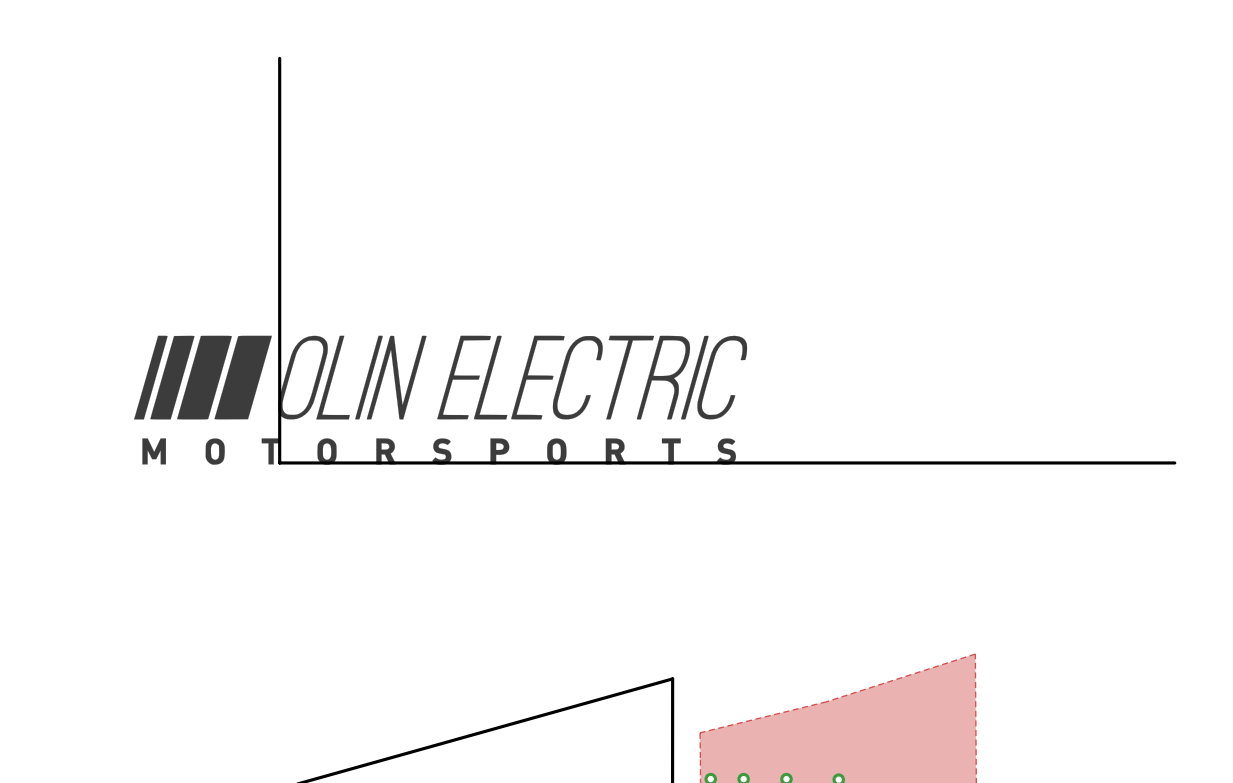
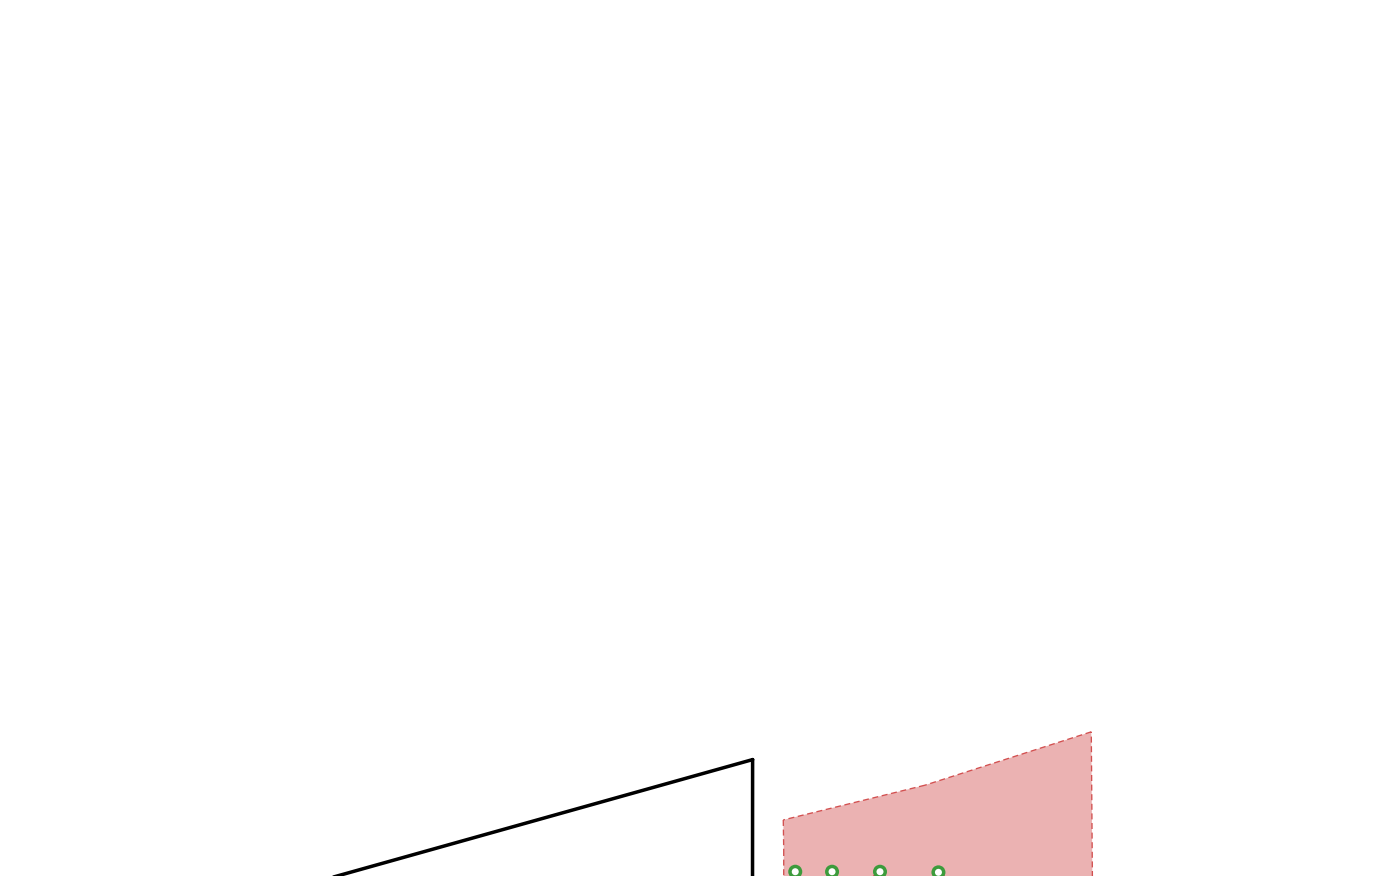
board edge: (279, 58) (279, 462) (1174, 462) -> none
drawing: [134, 335, 748, 465] -> none

